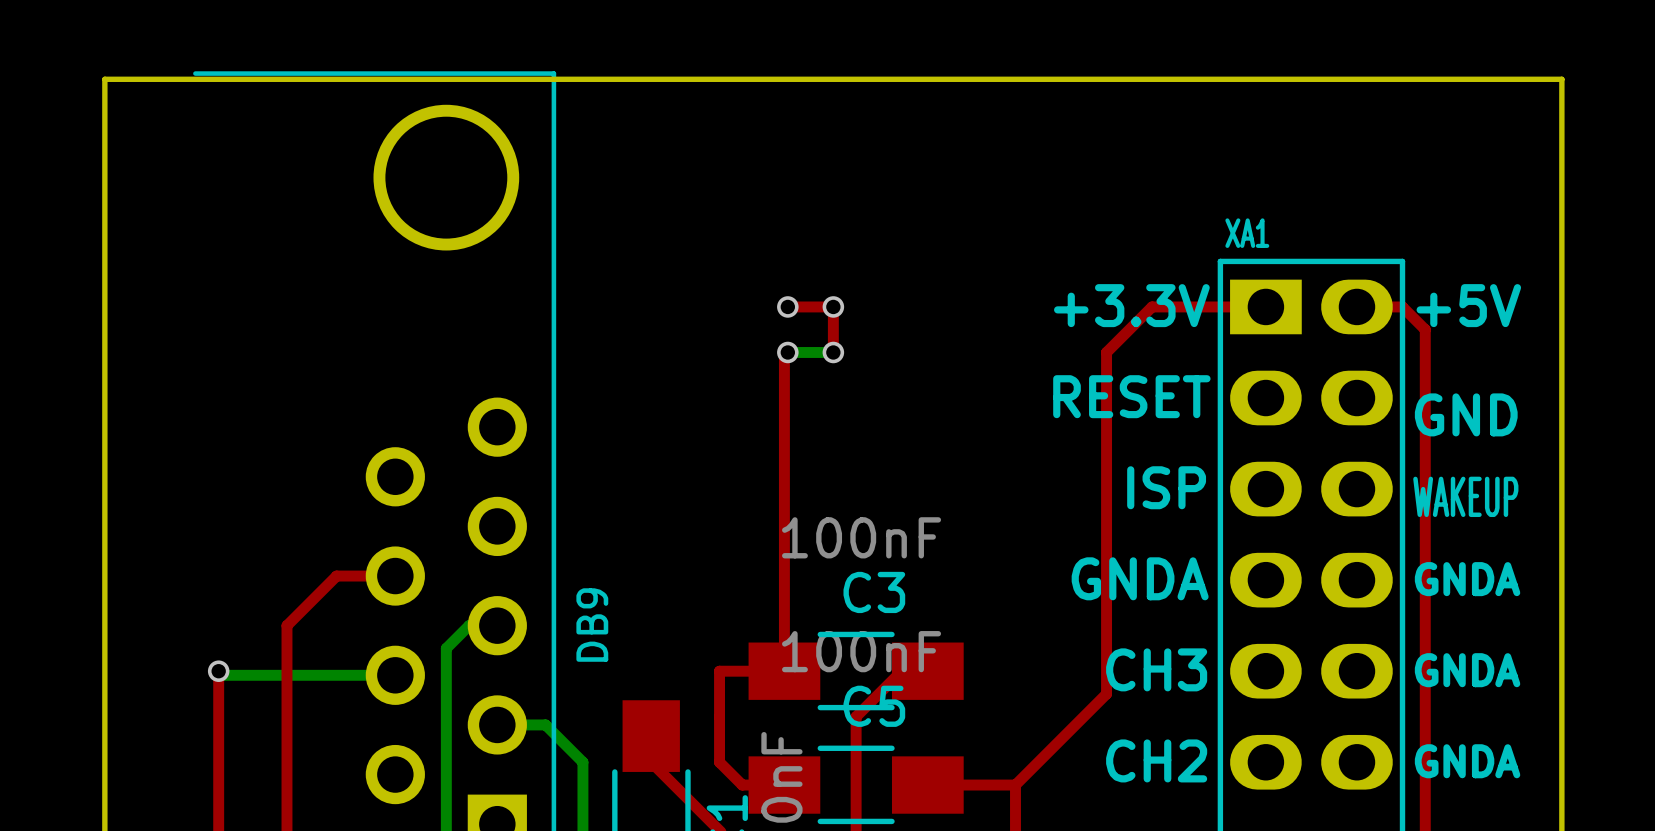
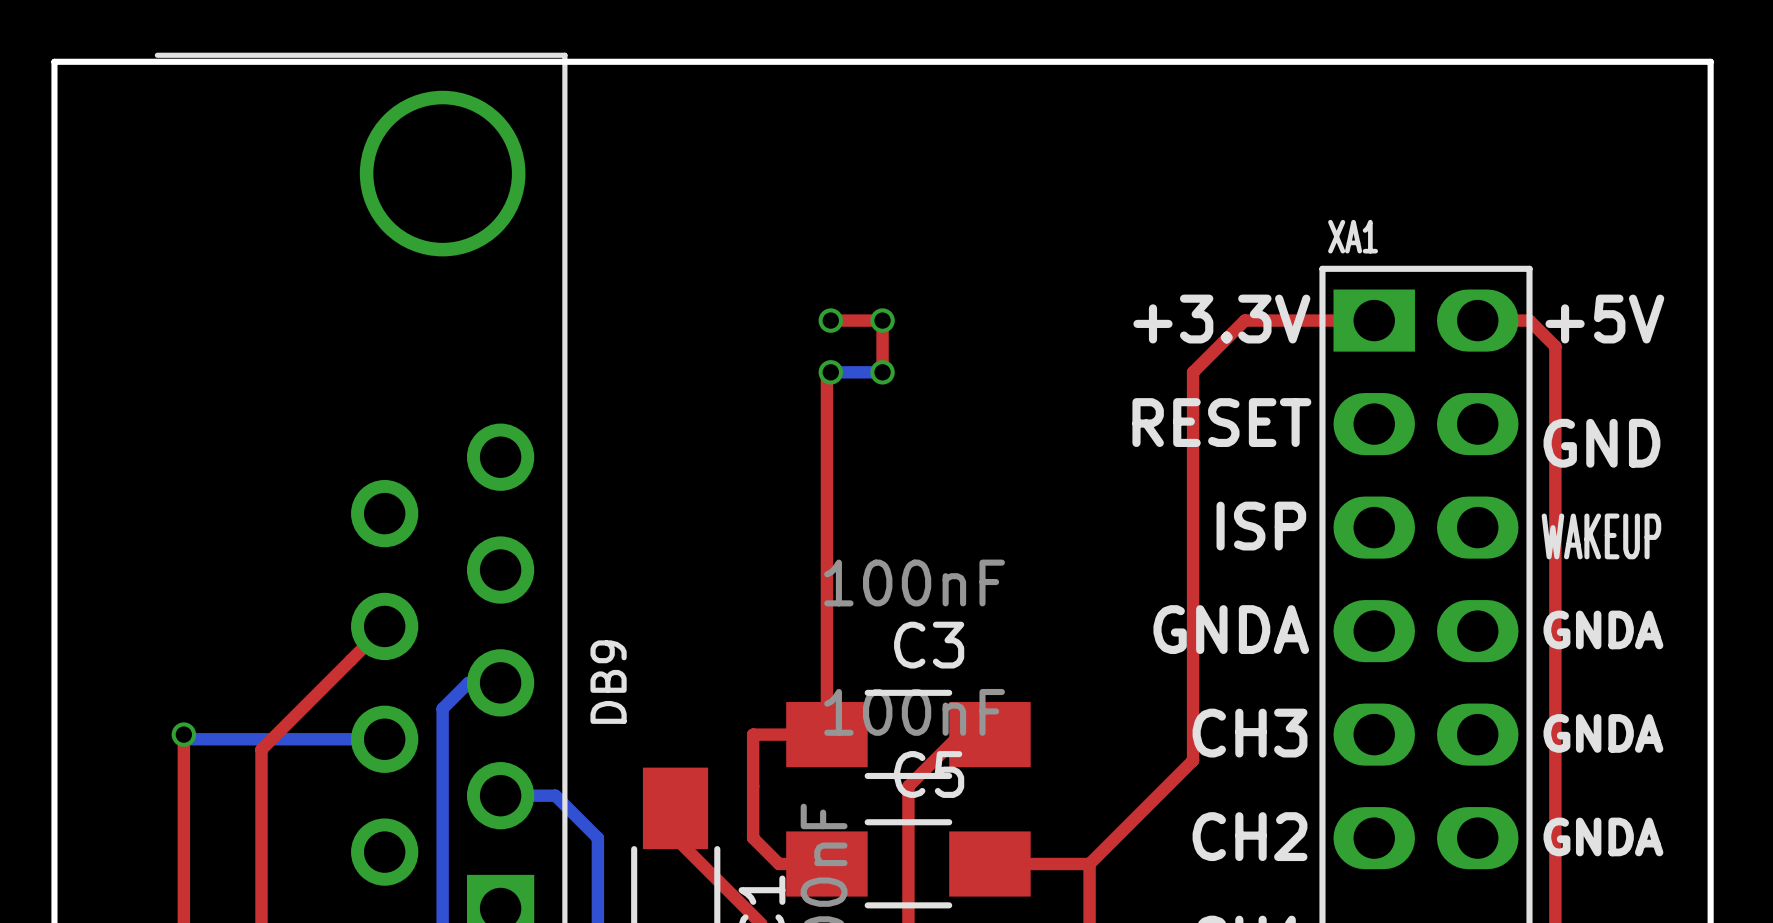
top track: (395, 576) (336, 576) (286, 625) (286, 684) -> (384, 626) (261, 749)

